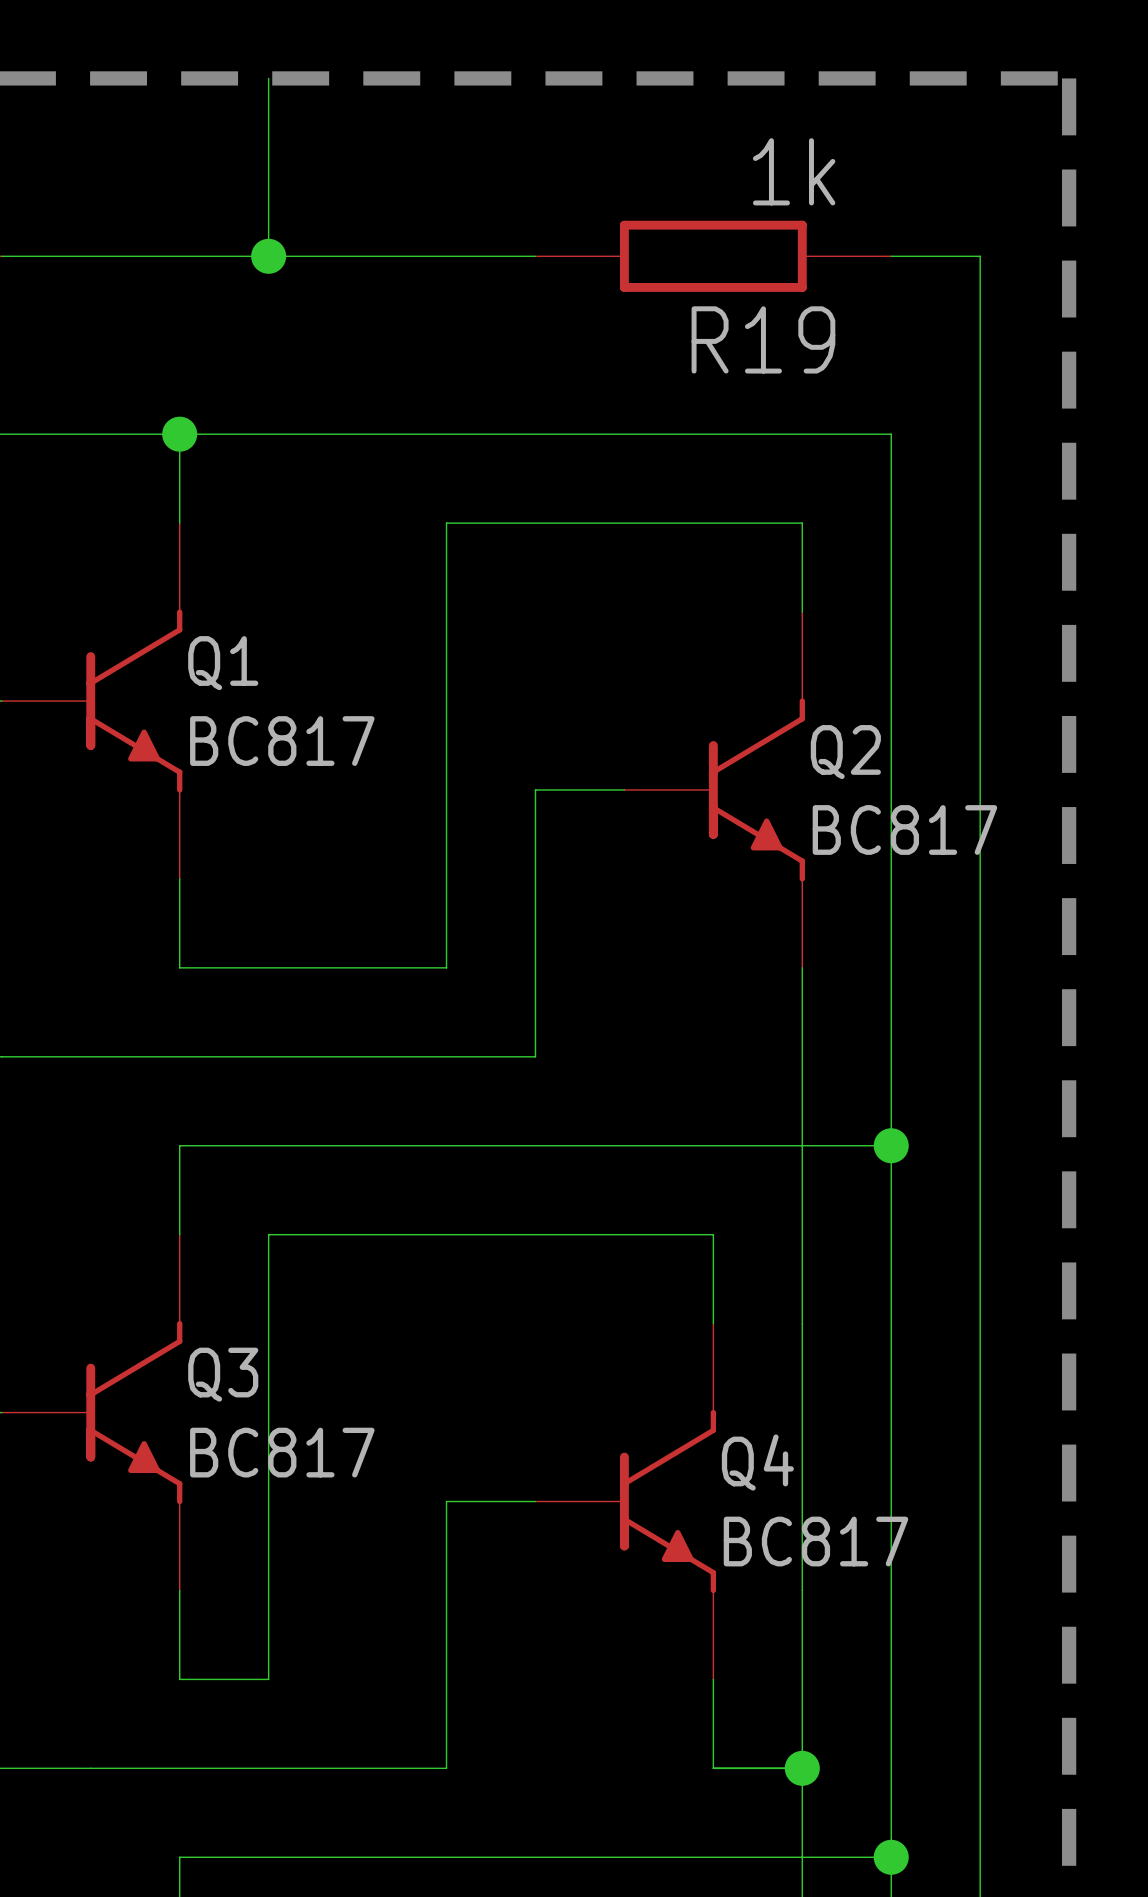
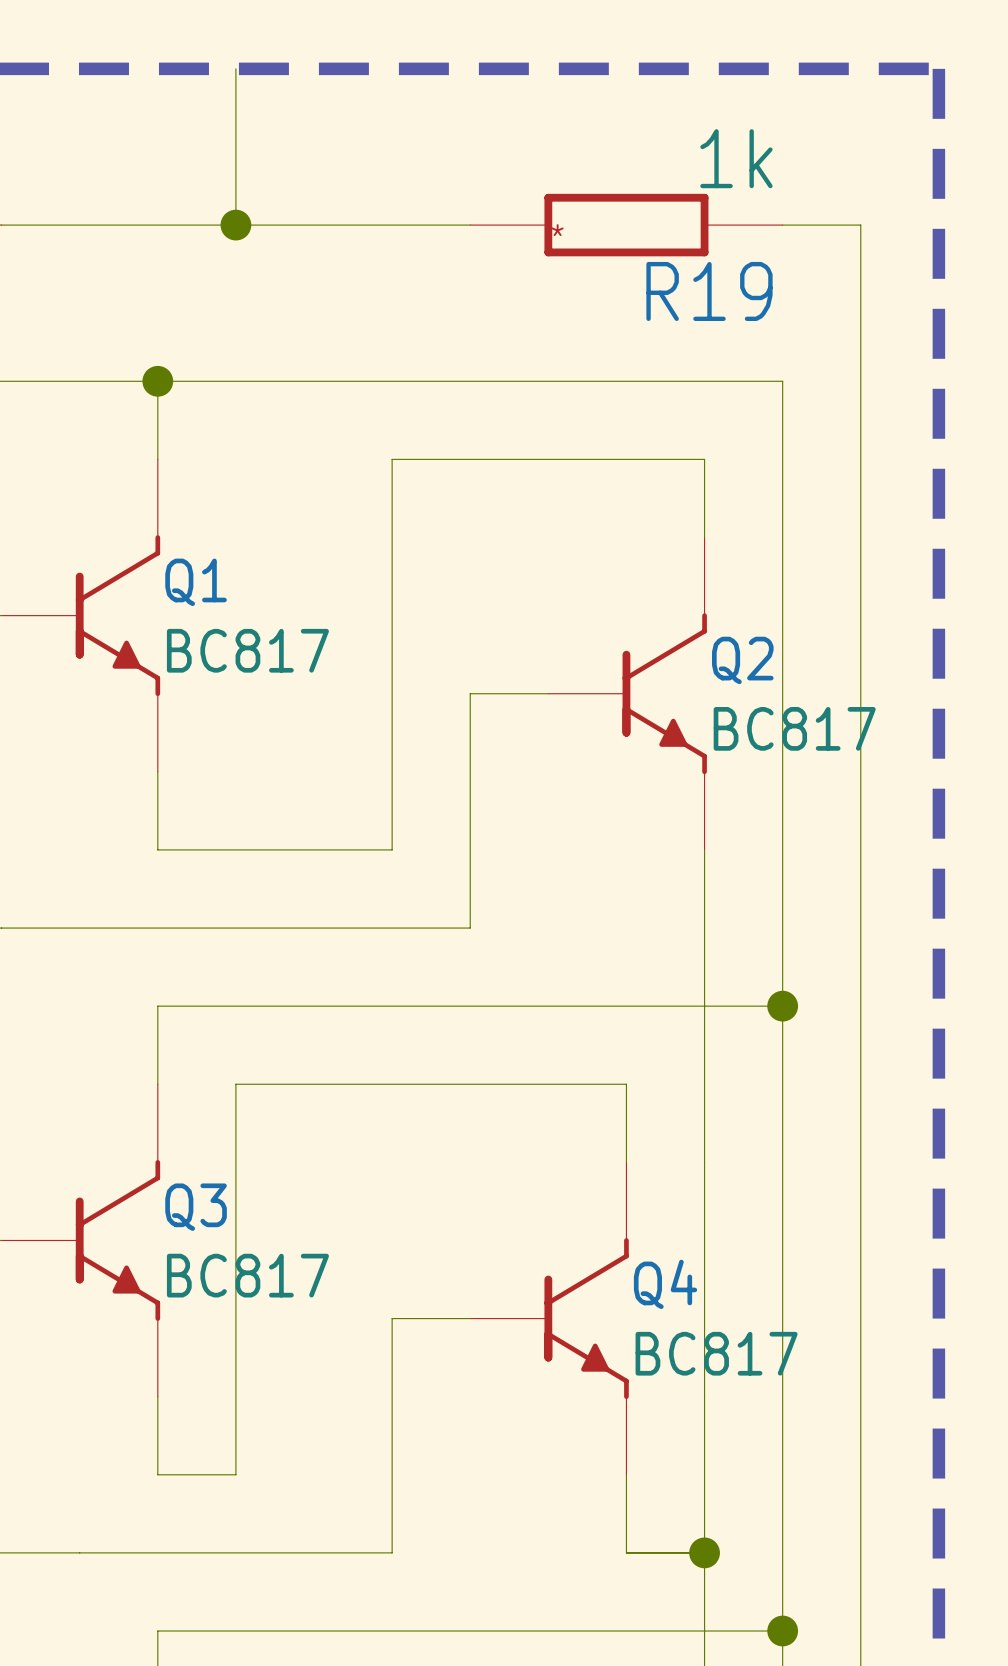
R19 value position: 1k (794, 171) -> 1k (736, 158)
R19 text: none -> * (557, 230)
R19 name position: R19 (763, 339) -> R19 (709, 291)

